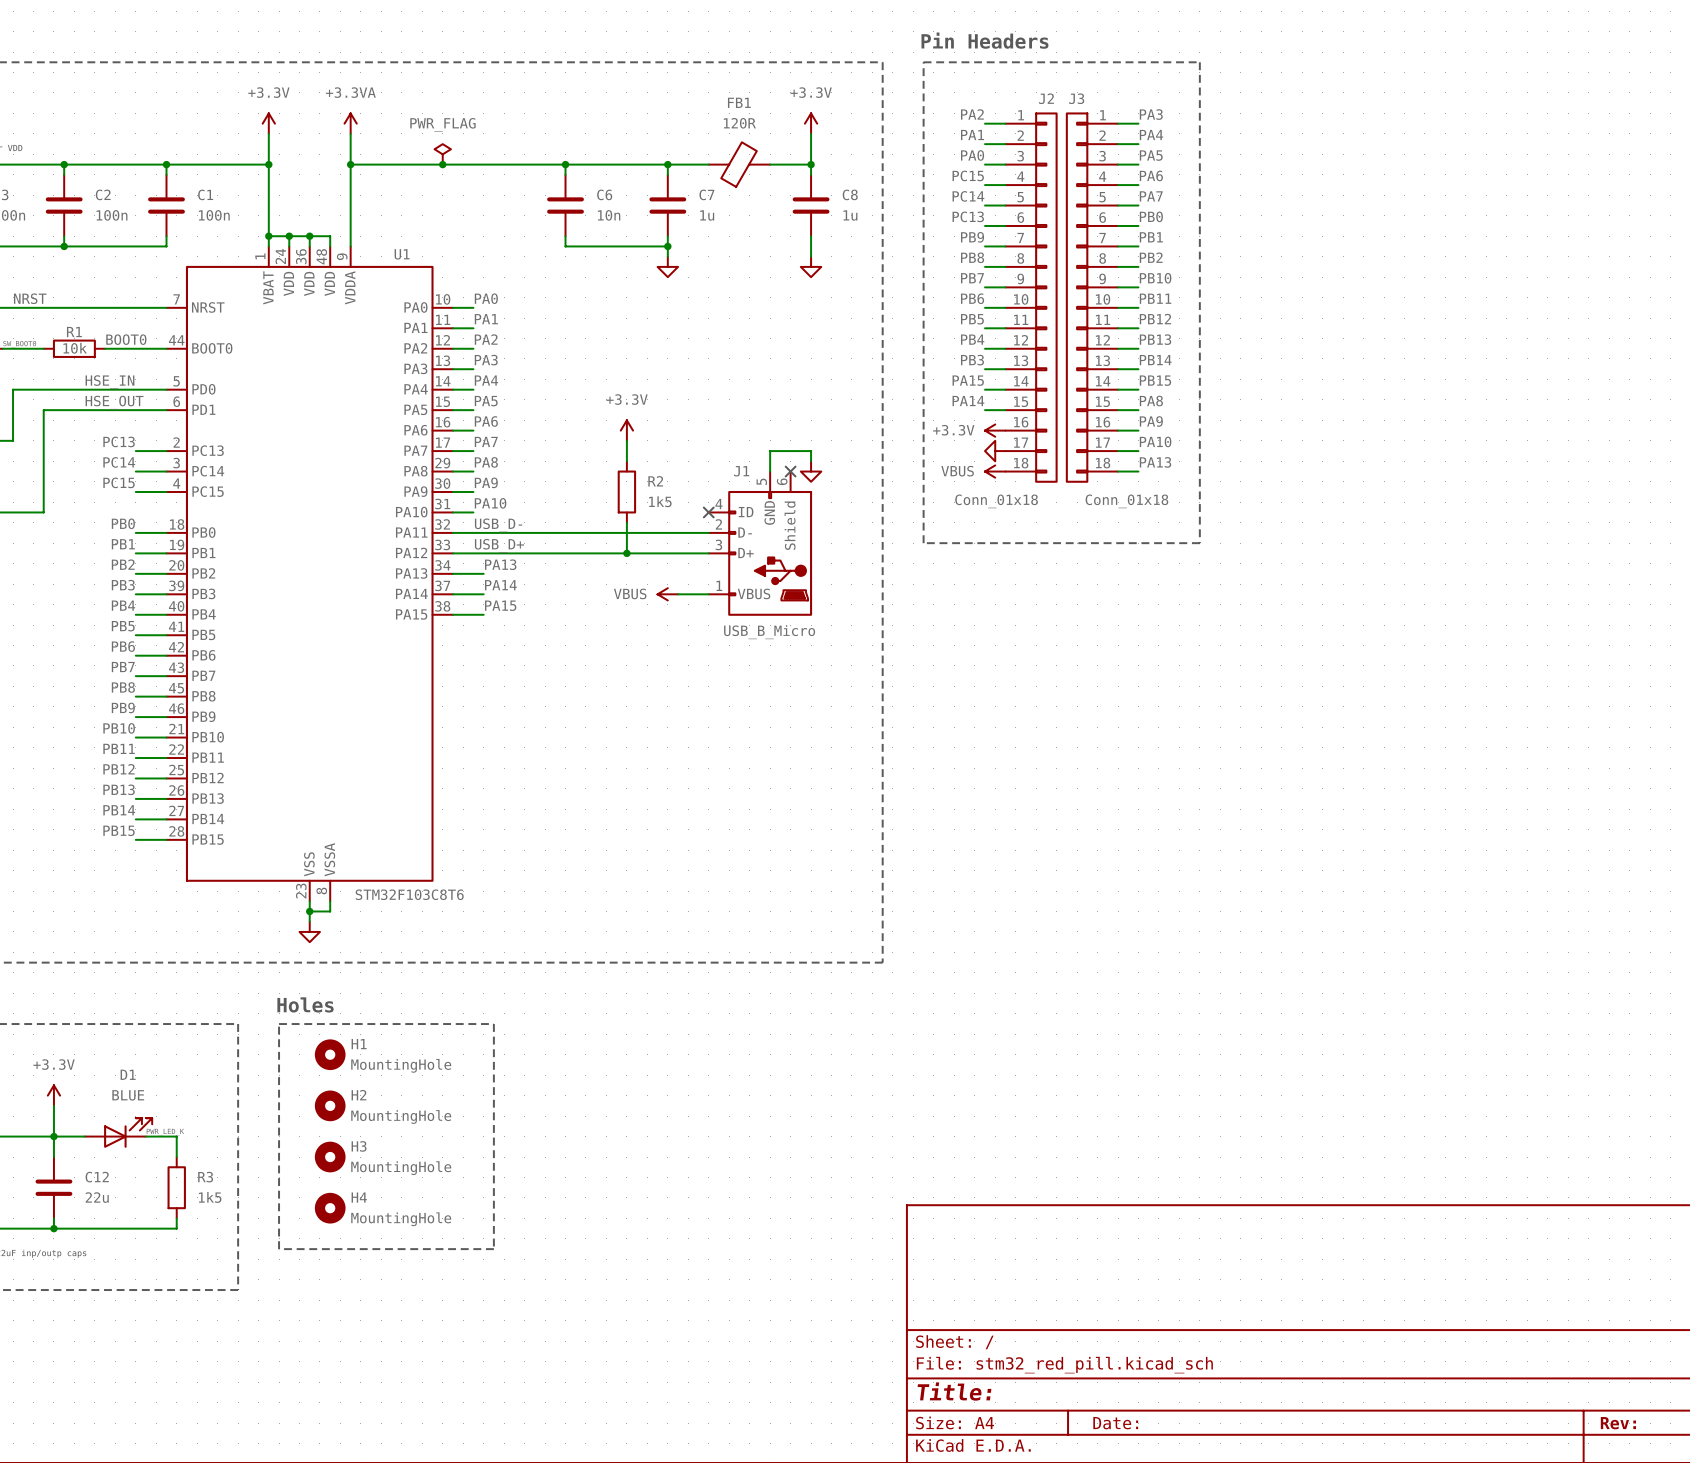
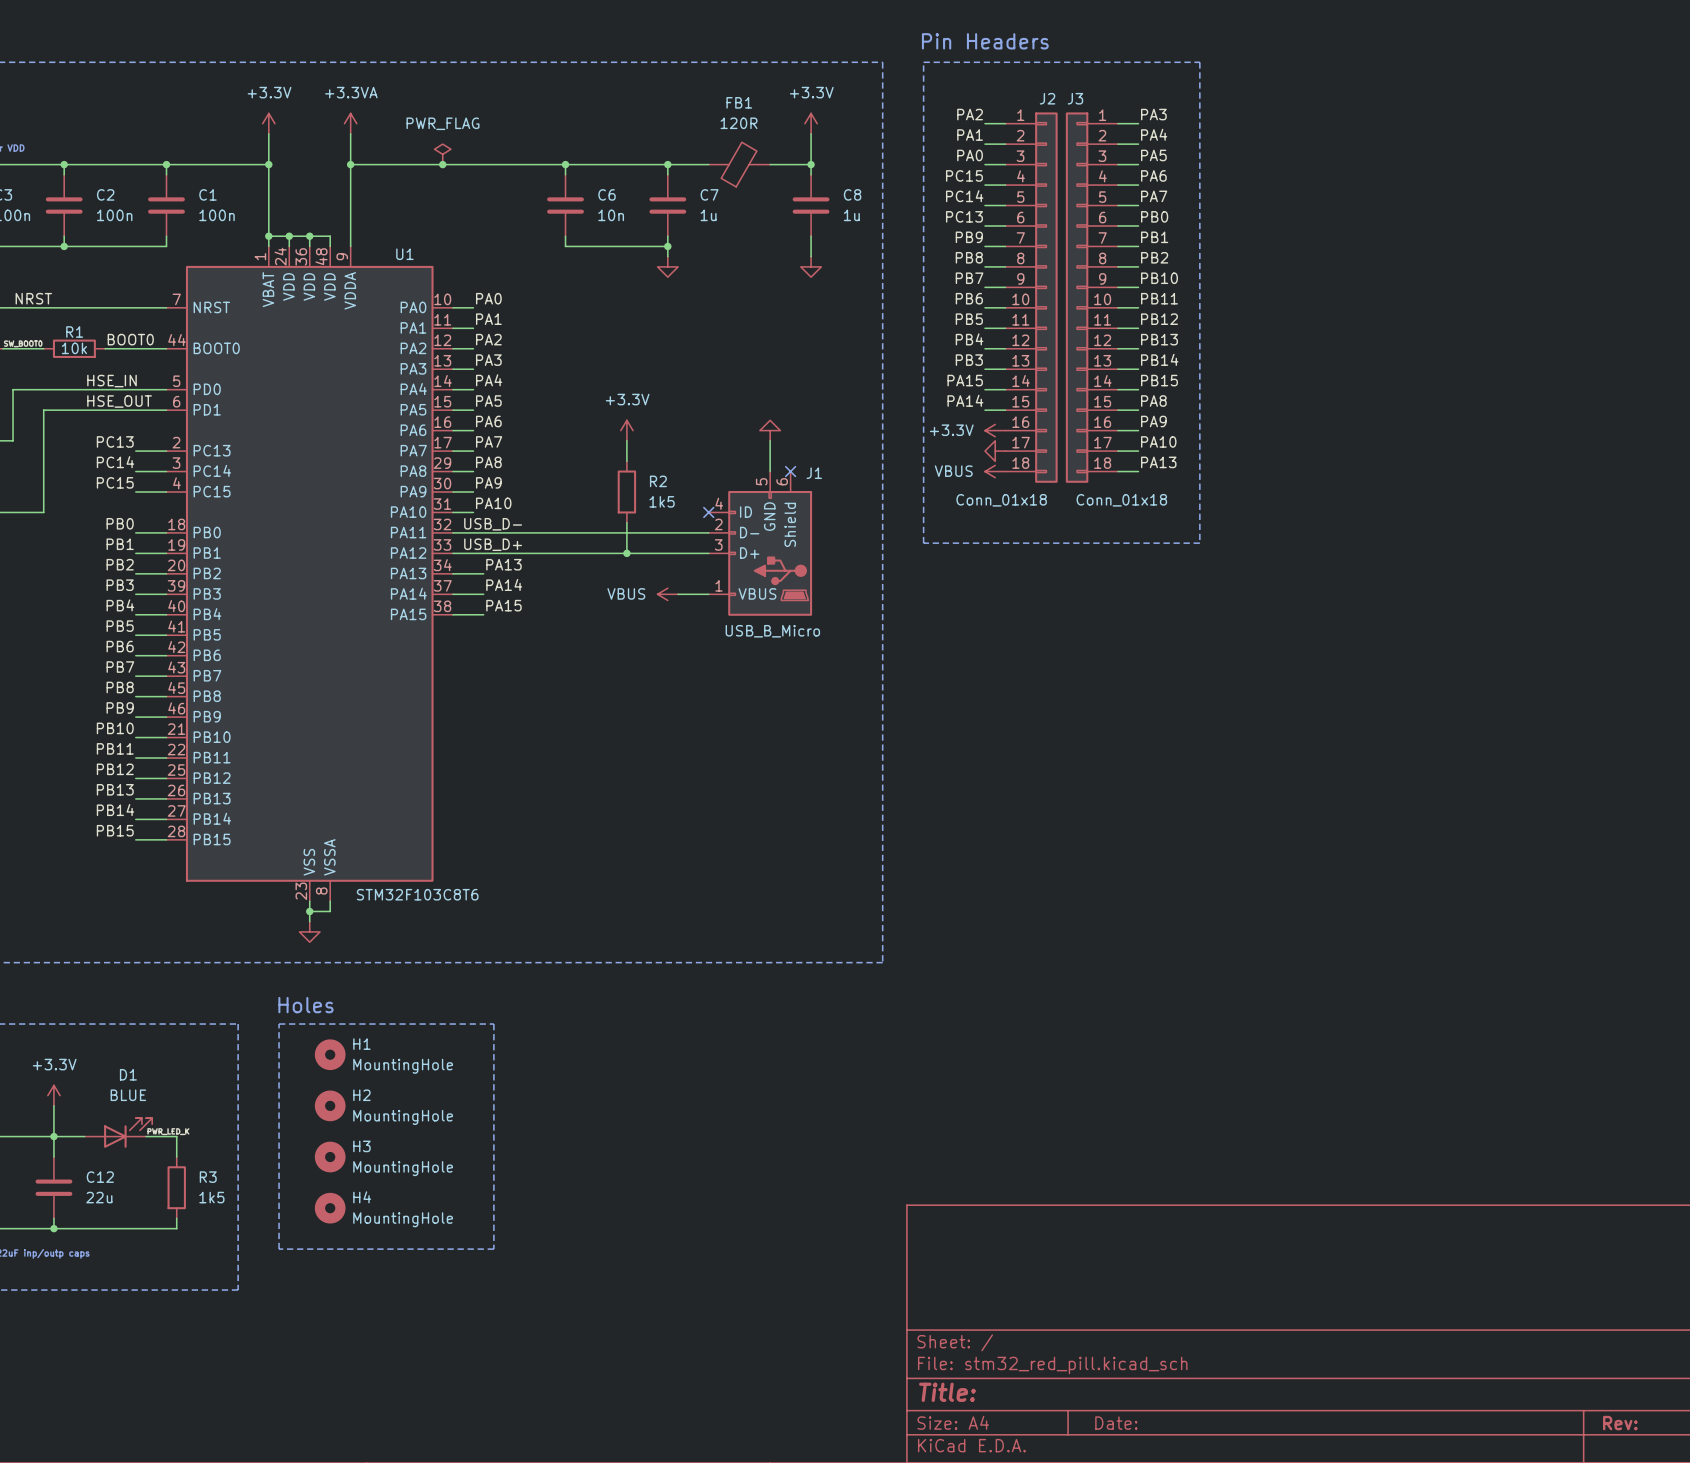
wire: (770, 451) (811, 451) (811, 461) -> (770, 451) (770, 440)
J1 name position: J1 (741, 471) -> J1 (814, 473)
power symbol rotation: 0° (811, 471) -> 180° (770, 430)
power symbol position: (811, 471) -> (770, 430)

